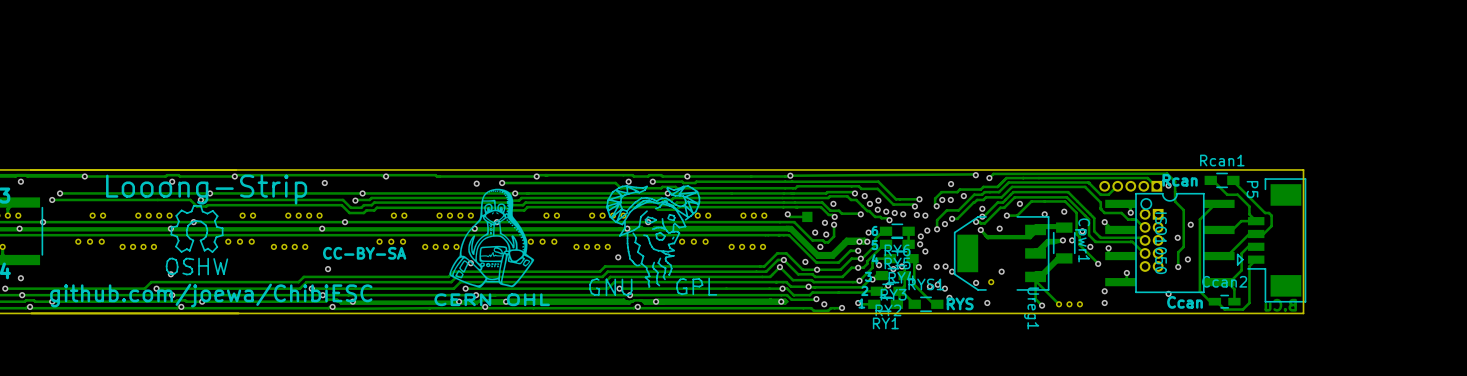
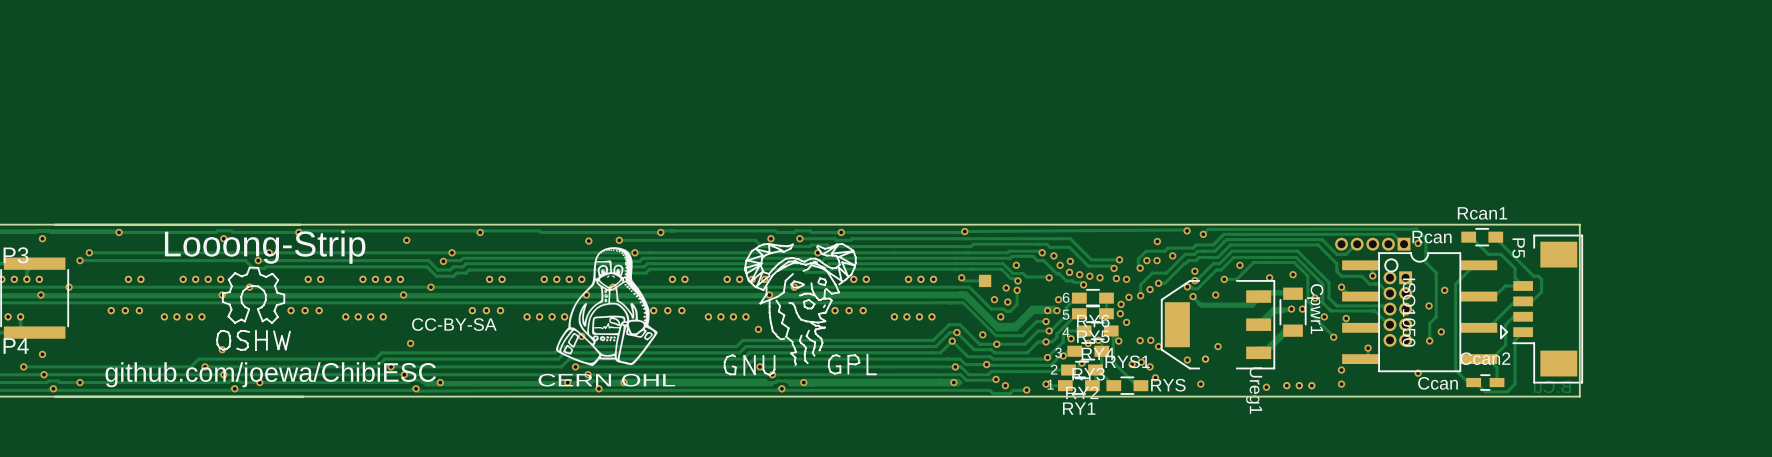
track: (1035, 276) (1035, 299) (1042, 305) -> none
track: (1035, 280) (1059, 304) -> none

